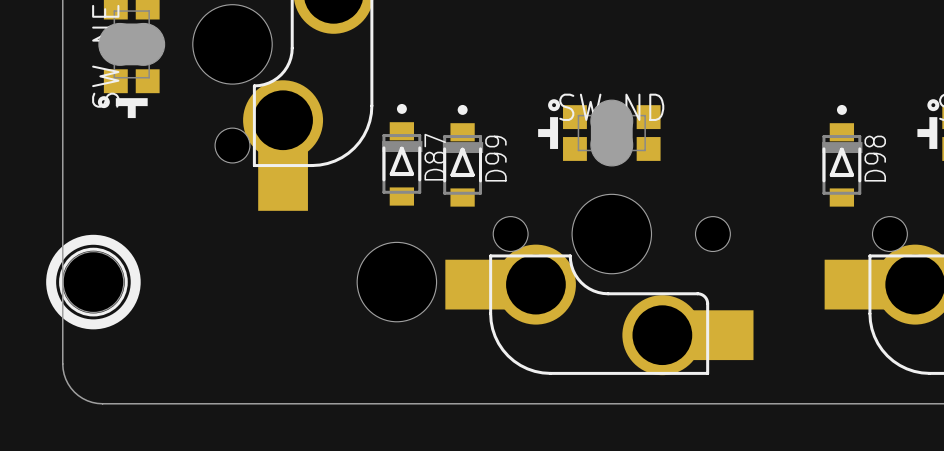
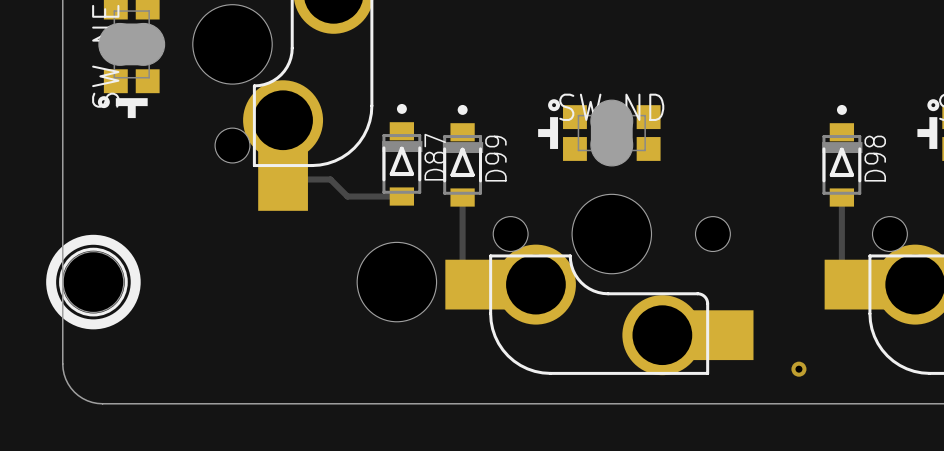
track: none -> (283, 179) (330, 179) (347, 196) (401, 196)
track: none -> (462, 197) (462, 270) (476, 284)
track: none -> (841, 197) (841, 270) (855, 284)
via: none -> (798, 369)

